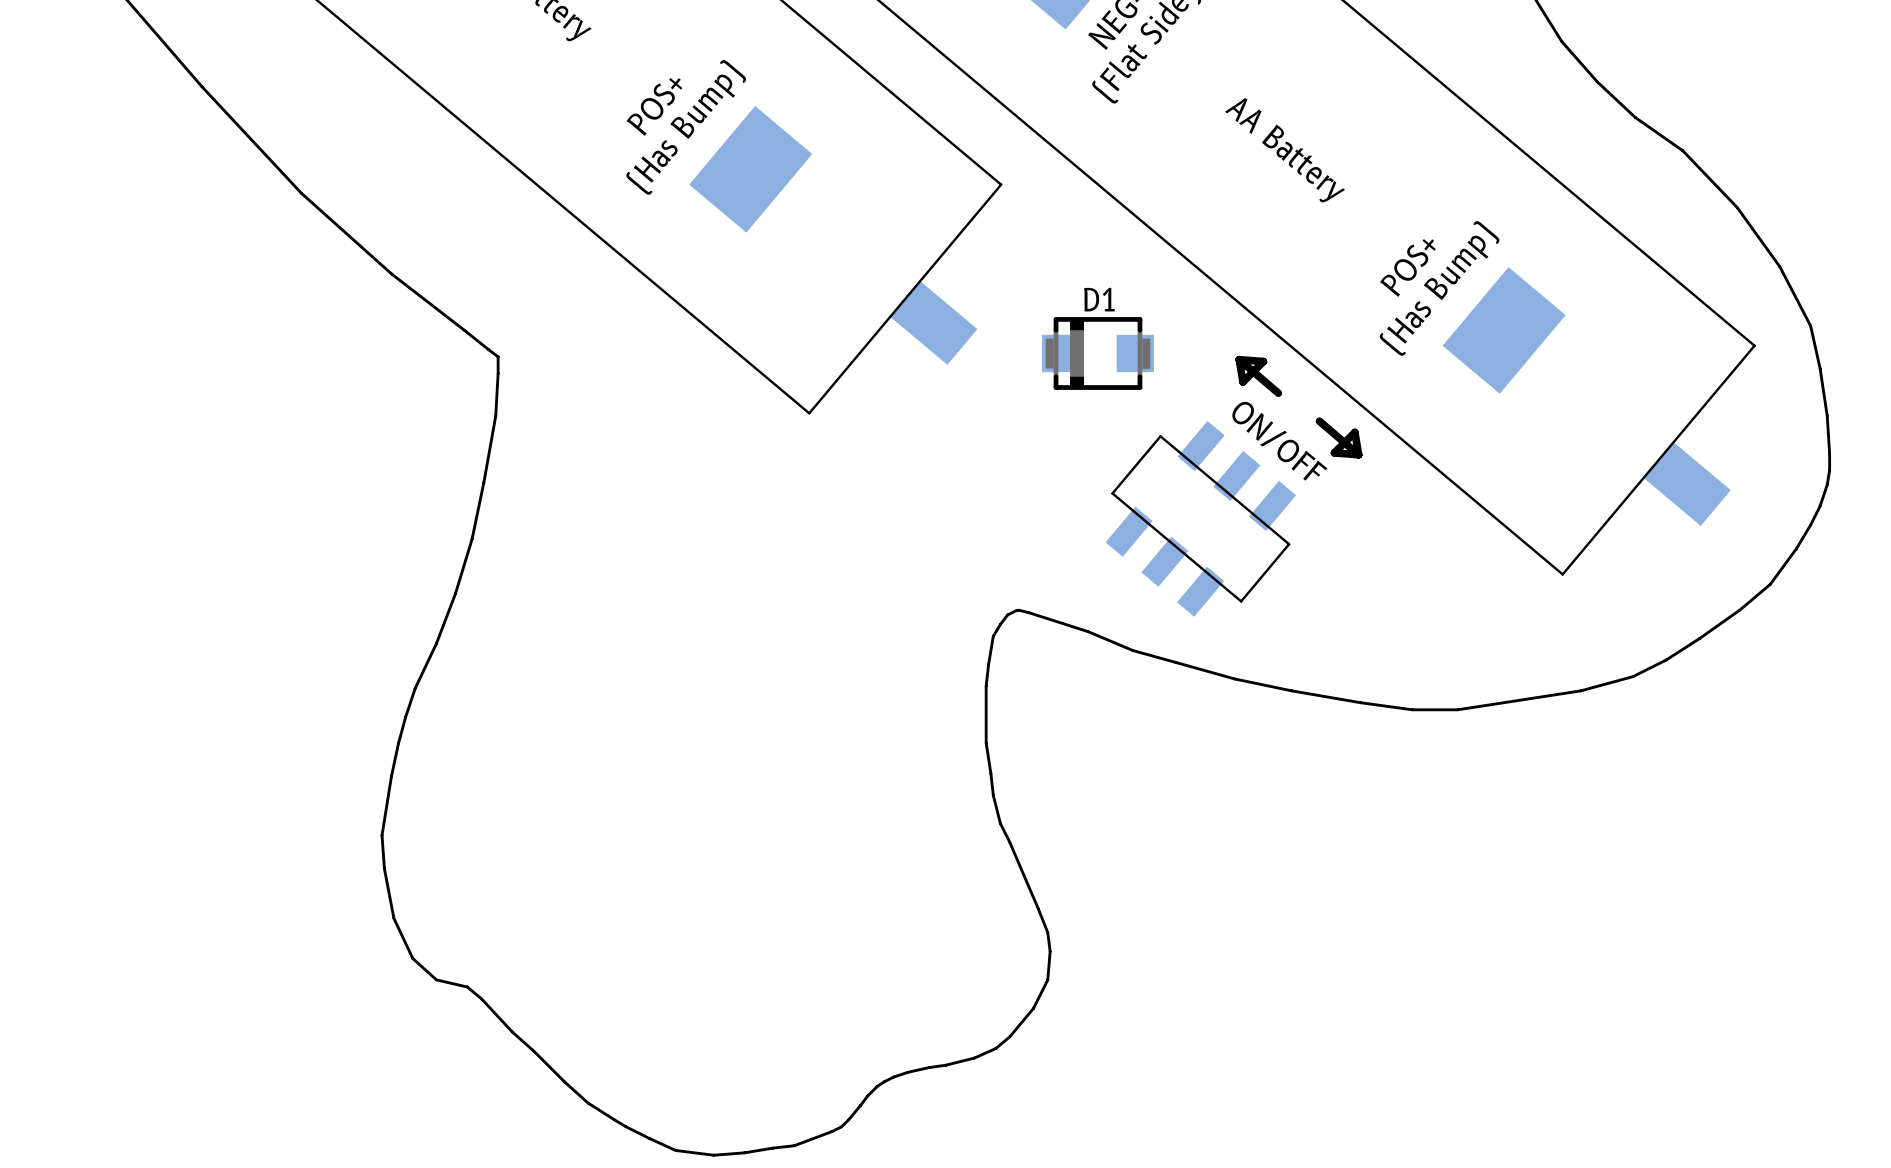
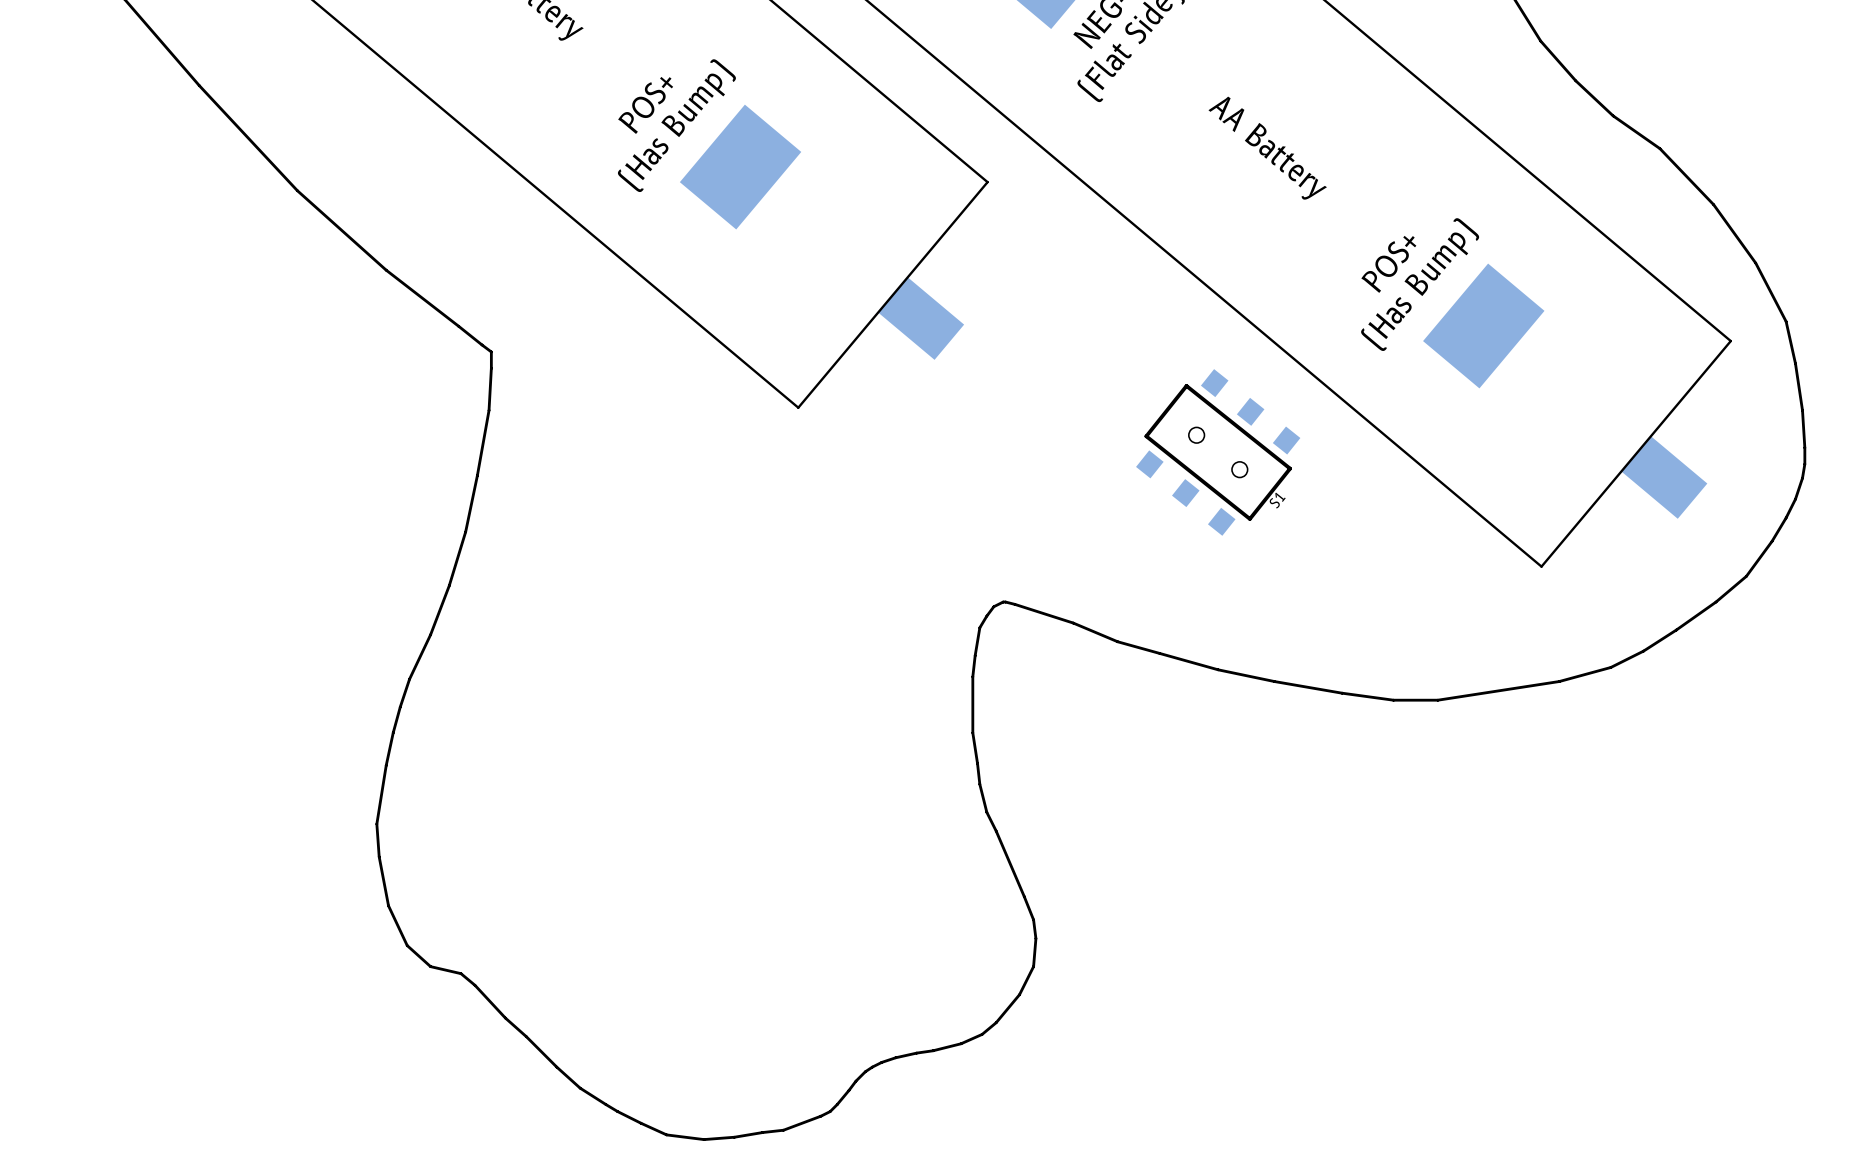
D1: (1098, 353) -> none
line: (1239, 359) (1278, 393) -> none
line: (1239, 359) (1263, 361) (1242, 382) (1239, 359) -> none
line: (1319, 421) (1358, 454) -> none
line: (1358, 454) (1334, 452) (1354, 432) (1358, 454) -> none
S1: none -> (1218, 452)
ON/OFF: (1200, 518) -> none

